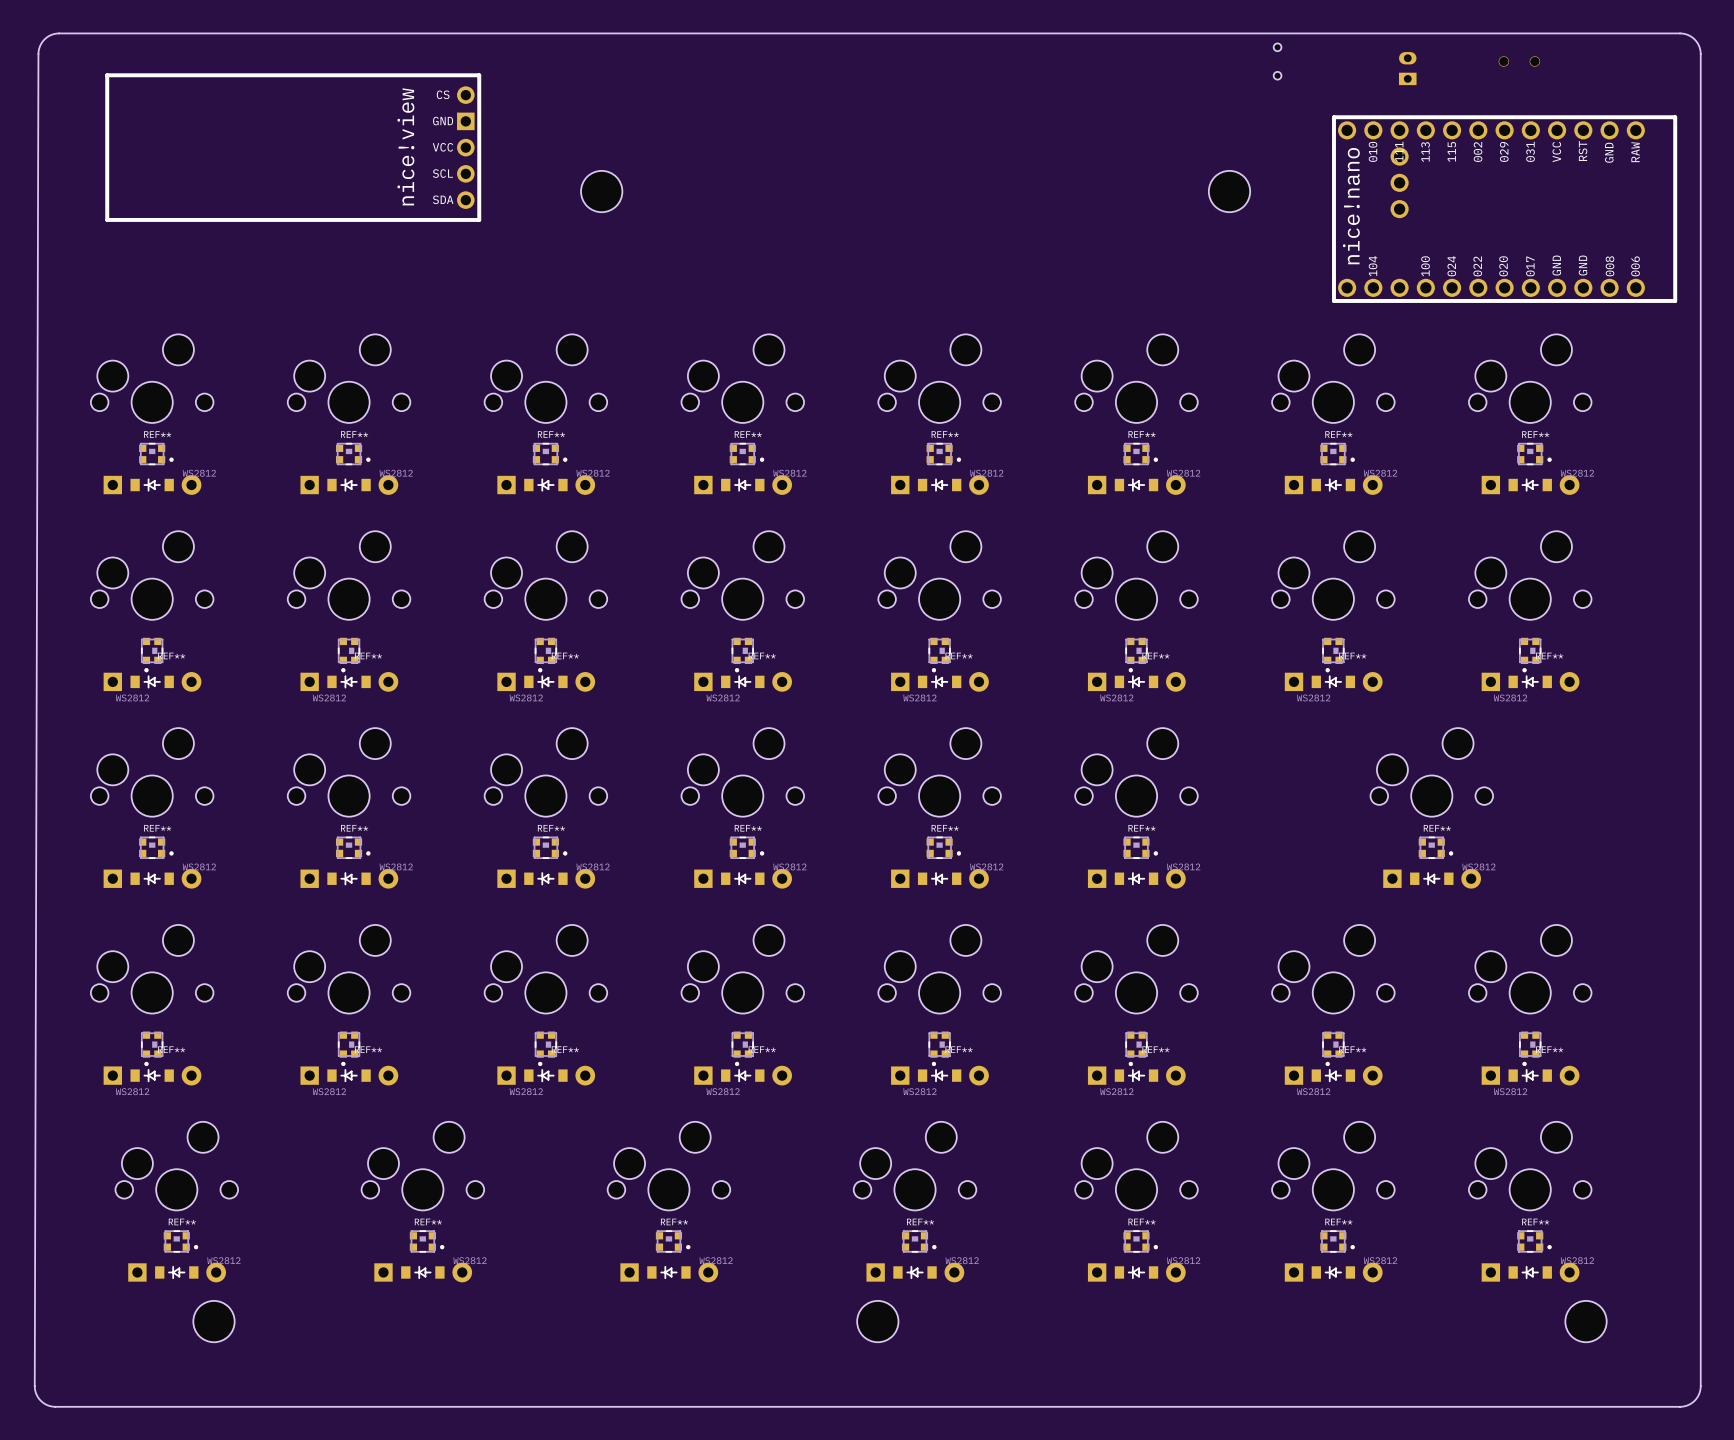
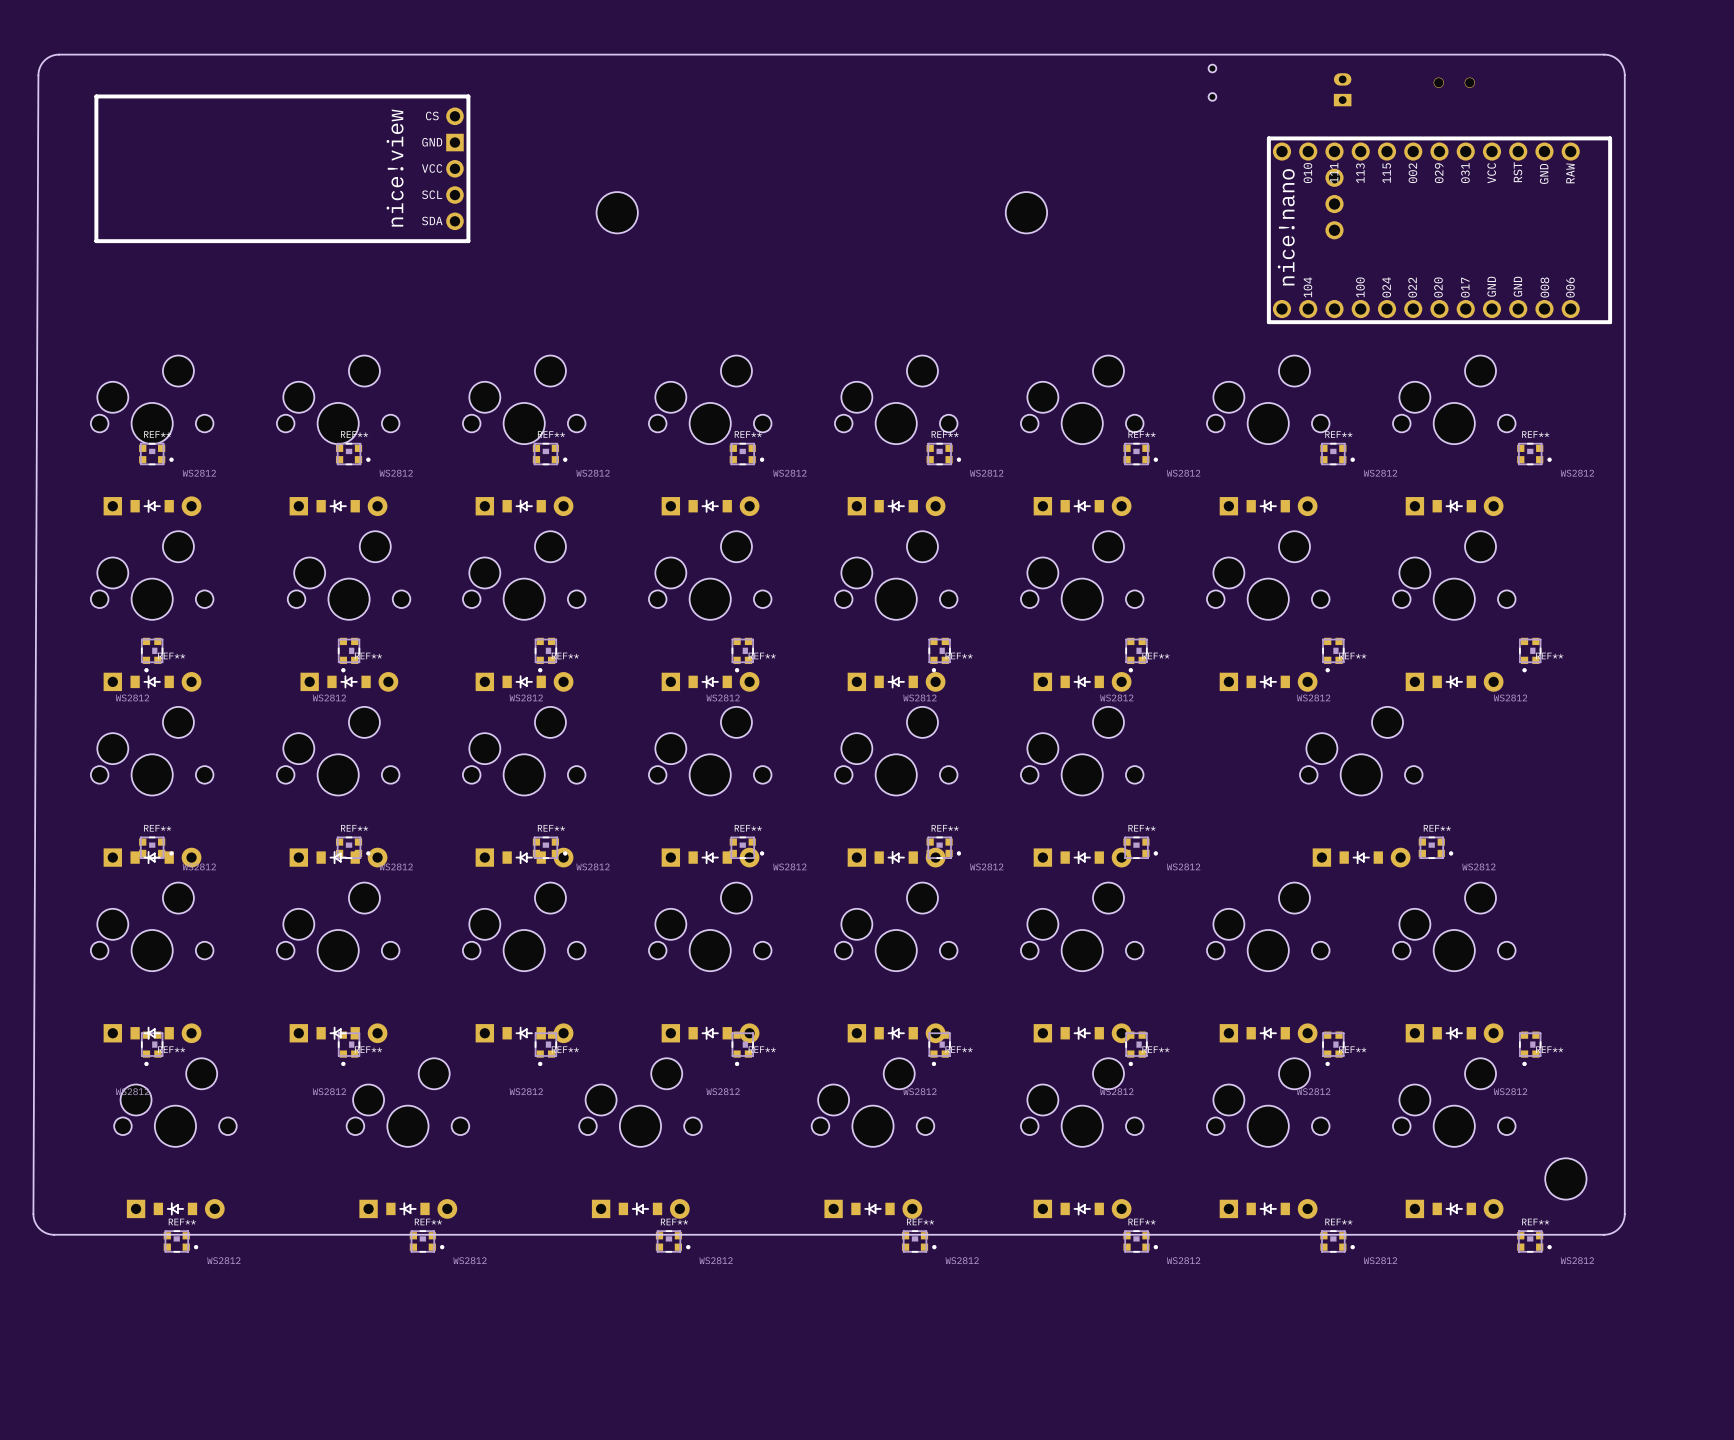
board edge: (59, 33) (1680, 33) (1692, 37) (1698, 45) (1700, 54) (1700, 1386) (1696, 1399) (1689, 1404) (1680, 1406) (55, 1406) (42, 1402) (36, 1395) (34, 1386) (38, 54) (40, 46) (44, 39) (51, 34) (59, 33) -> (59, 54) (51, 56) (44, 60) (40, 67) (38, 75) (33, 1214) (35, 1223) (41, 1230) (54, 1234) (1604, 1234) (1613, 1232) (1620, 1226) (1624, 1214) (1624, 75) (1622, 66) (1617, 59) (1604, 54) (59, 54)
part position: (1277, 61) -> (1212, 82)
part position: (1519, 61) -> (1454, 82)
part position: (1407, 68) -> (1342, 89)
part position: (293, 147) -> (282, 168)
part position: (601, 191) -> (617, 212)
part position: (1229, 191) -> (1026, 212)
part position: (1504, 209) -> (1439, 230)
part position: (152, 378) -> (152, 399)
part position: (349, 378) -> (338, 399)
part position: (545, 378) -> (524, 399)
part position: (742, 378) -> (710, 399)
part position: (939, 378) -> (896, 399)
part position: (1136, 378) -> (1082, 399)
part: (1333, 378) -> none
part: (1530, 378) -> none
part: none -> (1268, 399)
part: none -> (1454, 399)
part position: (152, 485) -> (152, 506)
part position: (349, 485) -> (338, 506)
part position: (546, 485) -> (524, 506)
part position: (743, 485) -> (710, 506)
part position: (939, 485) -> (896, 506)
part position: (1136, 485) -> (1082, 506)
part: (1333, 485) -> none
part: (1530, 485) -> none
part: none -> (1268, 506)
part: none -> (1454, 506)
part position: (545, 575) -> (524, 575)
part position: (742, 575) -> (710, 575)
part position: (939, 575) -> (896, 575)
part position: (1136, 575) -> (1082, 575)
part: none -> (1268, 575)
part: (1333, 575) -> none
part: none -> (1454, 575)
part: (1530, 575) -> none
part position: (546, 681) -> (524, 681)
part position: (743, 681) -> (710, 681)
part position: (939, 681) -> (896, 681)
part position: (1136, 681) -> (1082, 681)
part: none -> (1268, 681)
part: (1333, 681) -> none
part: none -> (1454, 681)
part: (1530, 681) -> none
part position: (152, 772) -> (152, 751)
part position: (349, 772) -> (338, 751)
part position: (545, 772) -> (524, 751)
part position: (742, 772) -> (710, 751)
part position: (939, 772) -> (896, 751)
part position: (1136, 772) -> (1082, 751)
part position: (1431, 772) -> (1361, 751)
part position: (152, 878) -> (152, 857)
part position: (349, 878) -> (338, 857)
part position: (546, 878) -> (524, 857)
part position: (743, 878) -> (710, 857)
part position: (939, 878) -> (896, 857)
part position: (1136, 878) -> (1082, 857)
part position: (1432, 878) -> (1361, 857)
part: none -> (1268, 926)
part: none -> (1454, 926)
part position: (152, 969) -> (152, 926)
part position: (349, 969) -> (338, 926)
part position: (545, 969) -> (524, 926)
part position: (742, 969) -> (710, 926)
part position: (939, 969) -> (896, 926)
part position: (1136, 969) -> (1082, 926)
part: (1333, 969) -> none
part: (1530, 969) -> none
part: none -> (1268, 1033)
part: none -> (1454, 1033)
part position: (152, 1075) -> (152, 1033)
part position: (349, 1075) -> (338, 1033)
part position: (546, 1075) -> (524, 1033)
part position: (743, 1075) -> (710, 1033)
part position: (939, 1075) -> (896, 1033)
part position: (1136, 1075) -> (1082, 1033)
part: (1333, 1075) -> none
part: (1530, 1075) -> none
part: none -> (872, 1102)
part: none -> (1082, 1102)
part: none -> (1268, 1102)
part: none -> (1454, 1102)
part position: (176, 1166) -> (175, 1102)
part position: (422, 1166) -> (407, 1102)
part position: (668, 1166) -> (640, 1102)
part: (915, 1166) -> none
part: (1136, 1166) -> none
part: (1333, 1166) -> none
part: (1530, 1166) -> none
part: none -> (873, 1208)
part: none -> (1082, 1208)
part: none -> (1268, 1208)
part: none -> (1454, 1208)
part position: (177, 1272) -> (175, 1208)
part position: (423, 1272) -> (408, 1208)
part position: (669, 1272) -> (640, 1208)
part: (915, 1272) -> none
part: (1136, 1272) -> none
part: (1333, 1272) -> none
part: (1530, 1272) -> none
part: (213, 1321) -> none
part: (877, 1321) -> none
part position: (1586, 1321) -> (1565, 1178)

